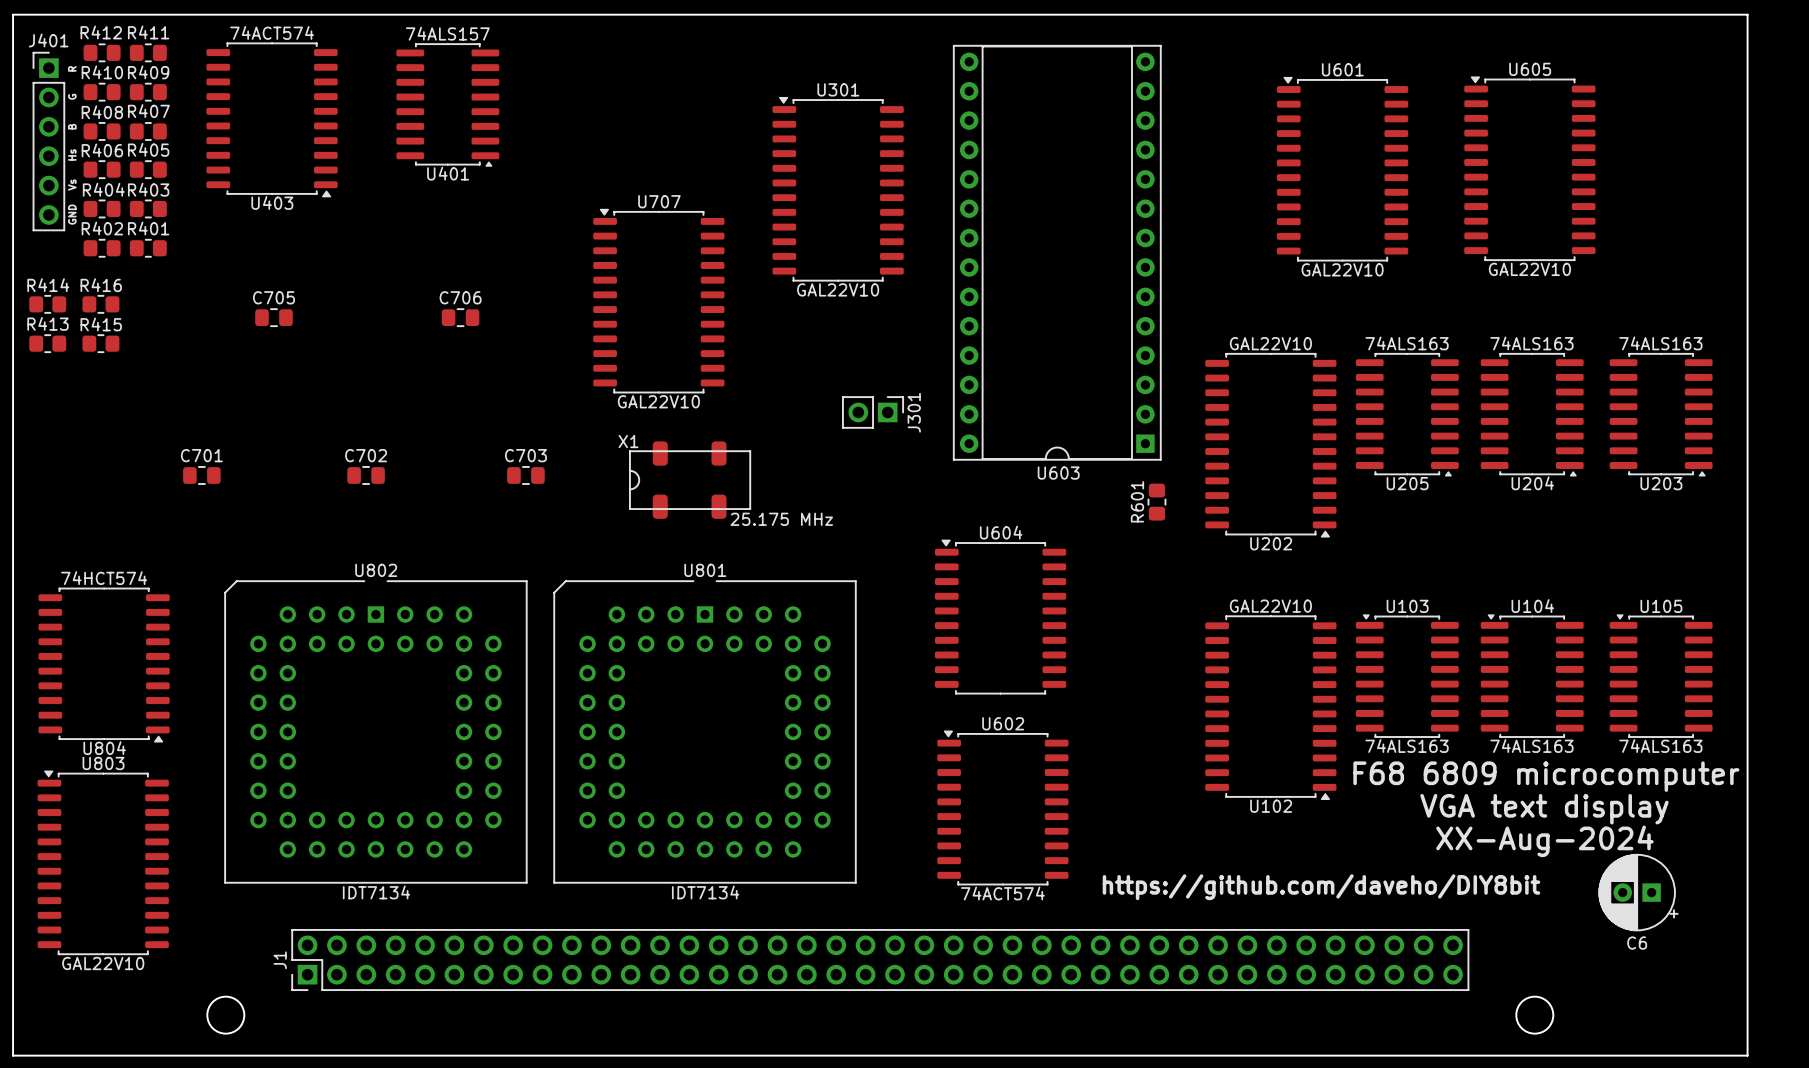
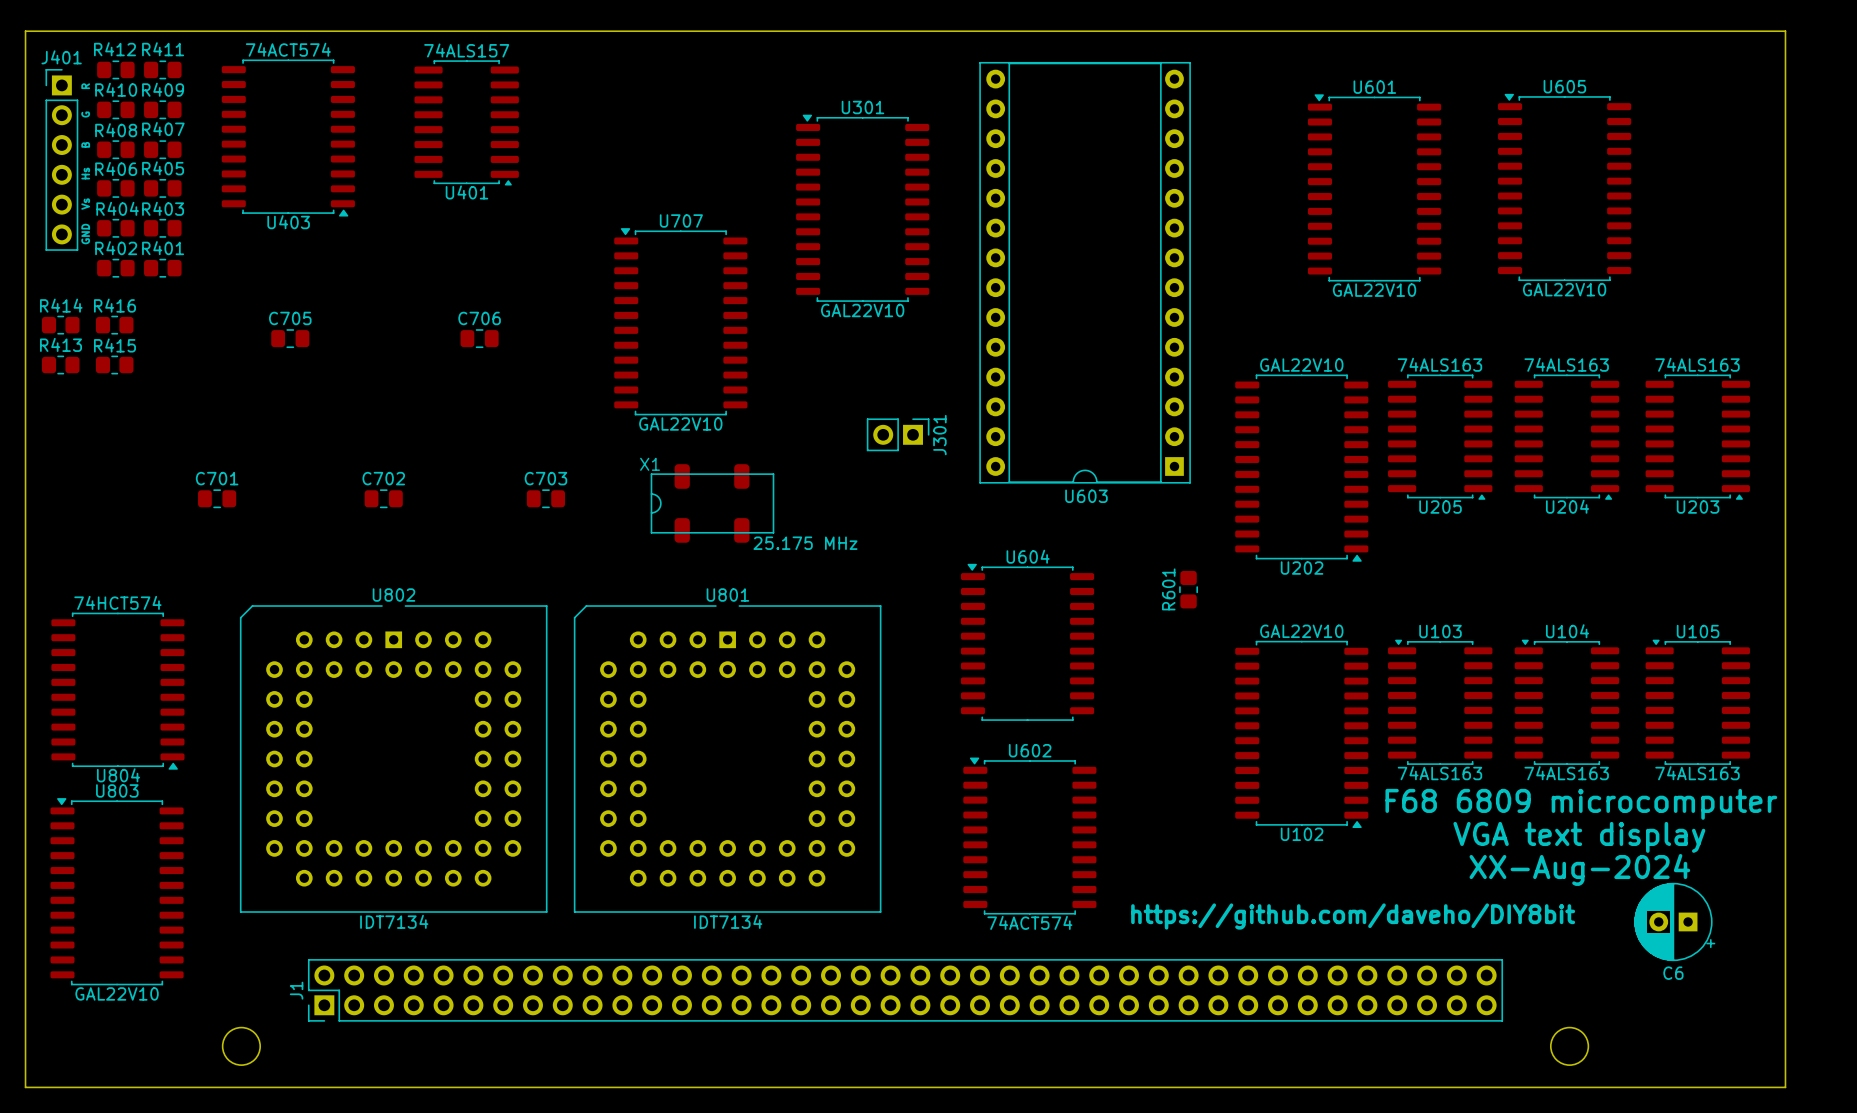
R601 position: (1156, 502) -> (1188, 589)

